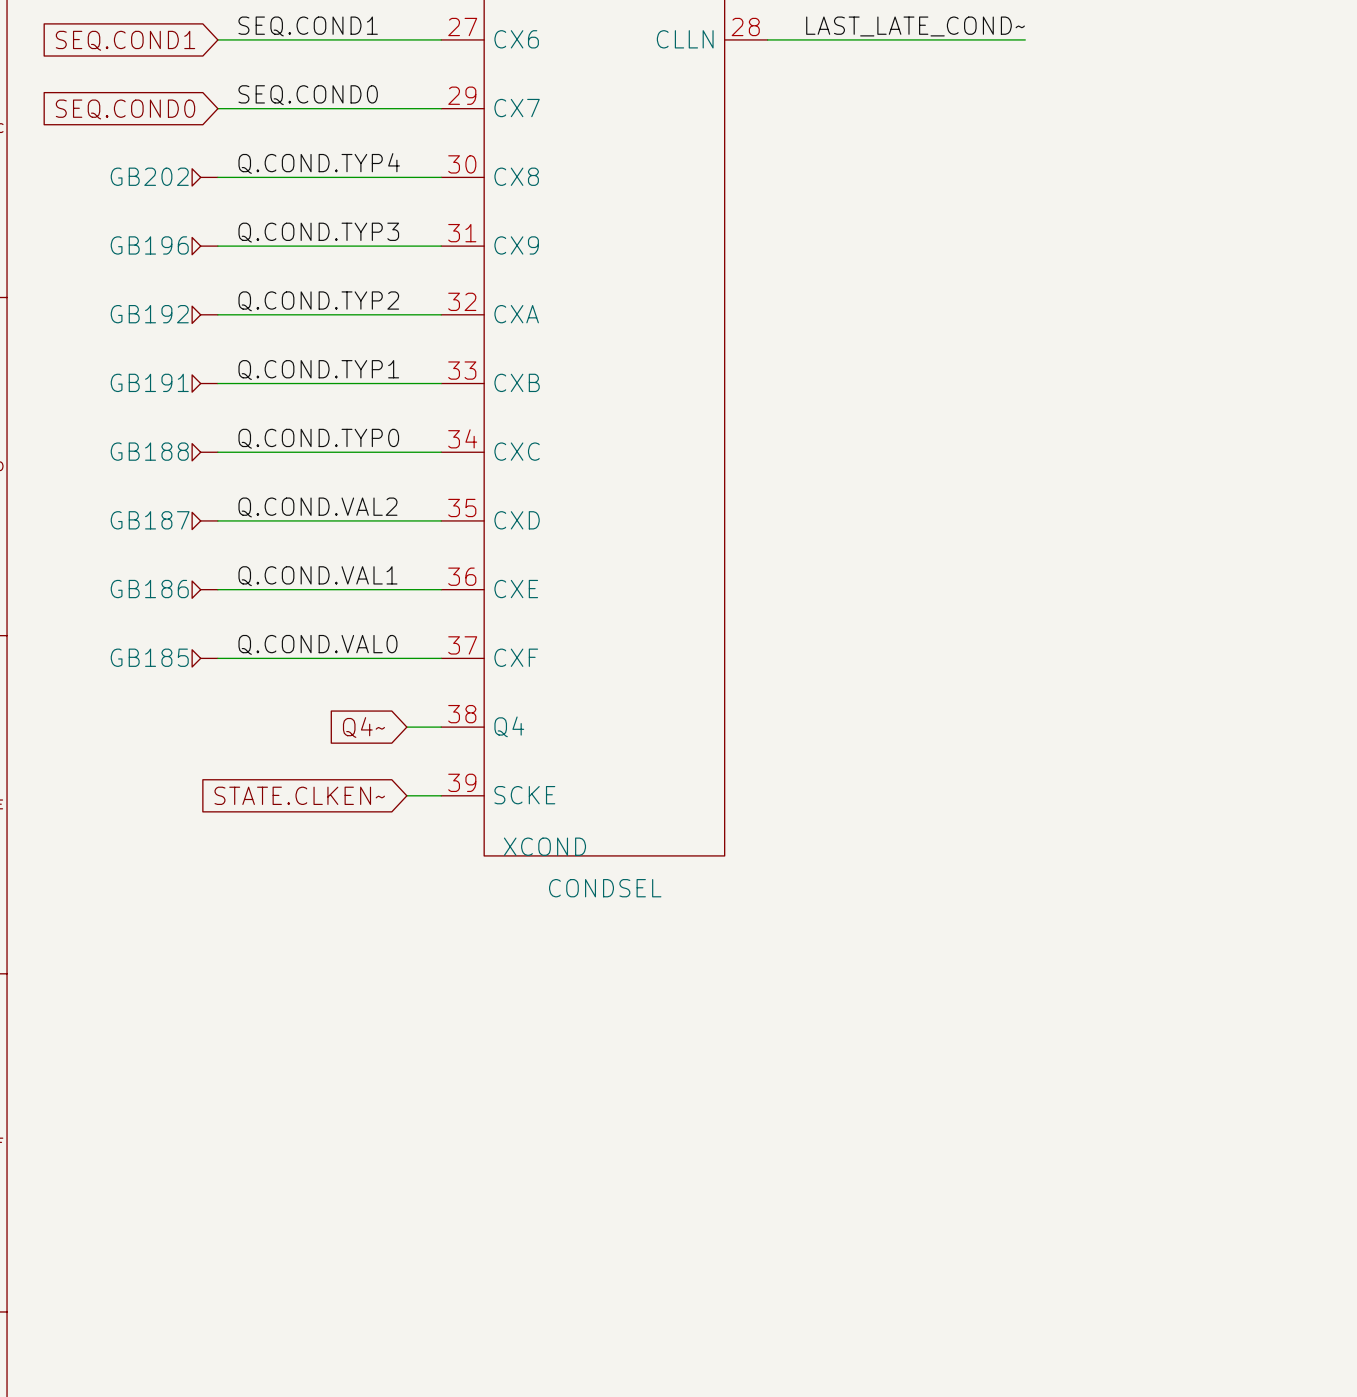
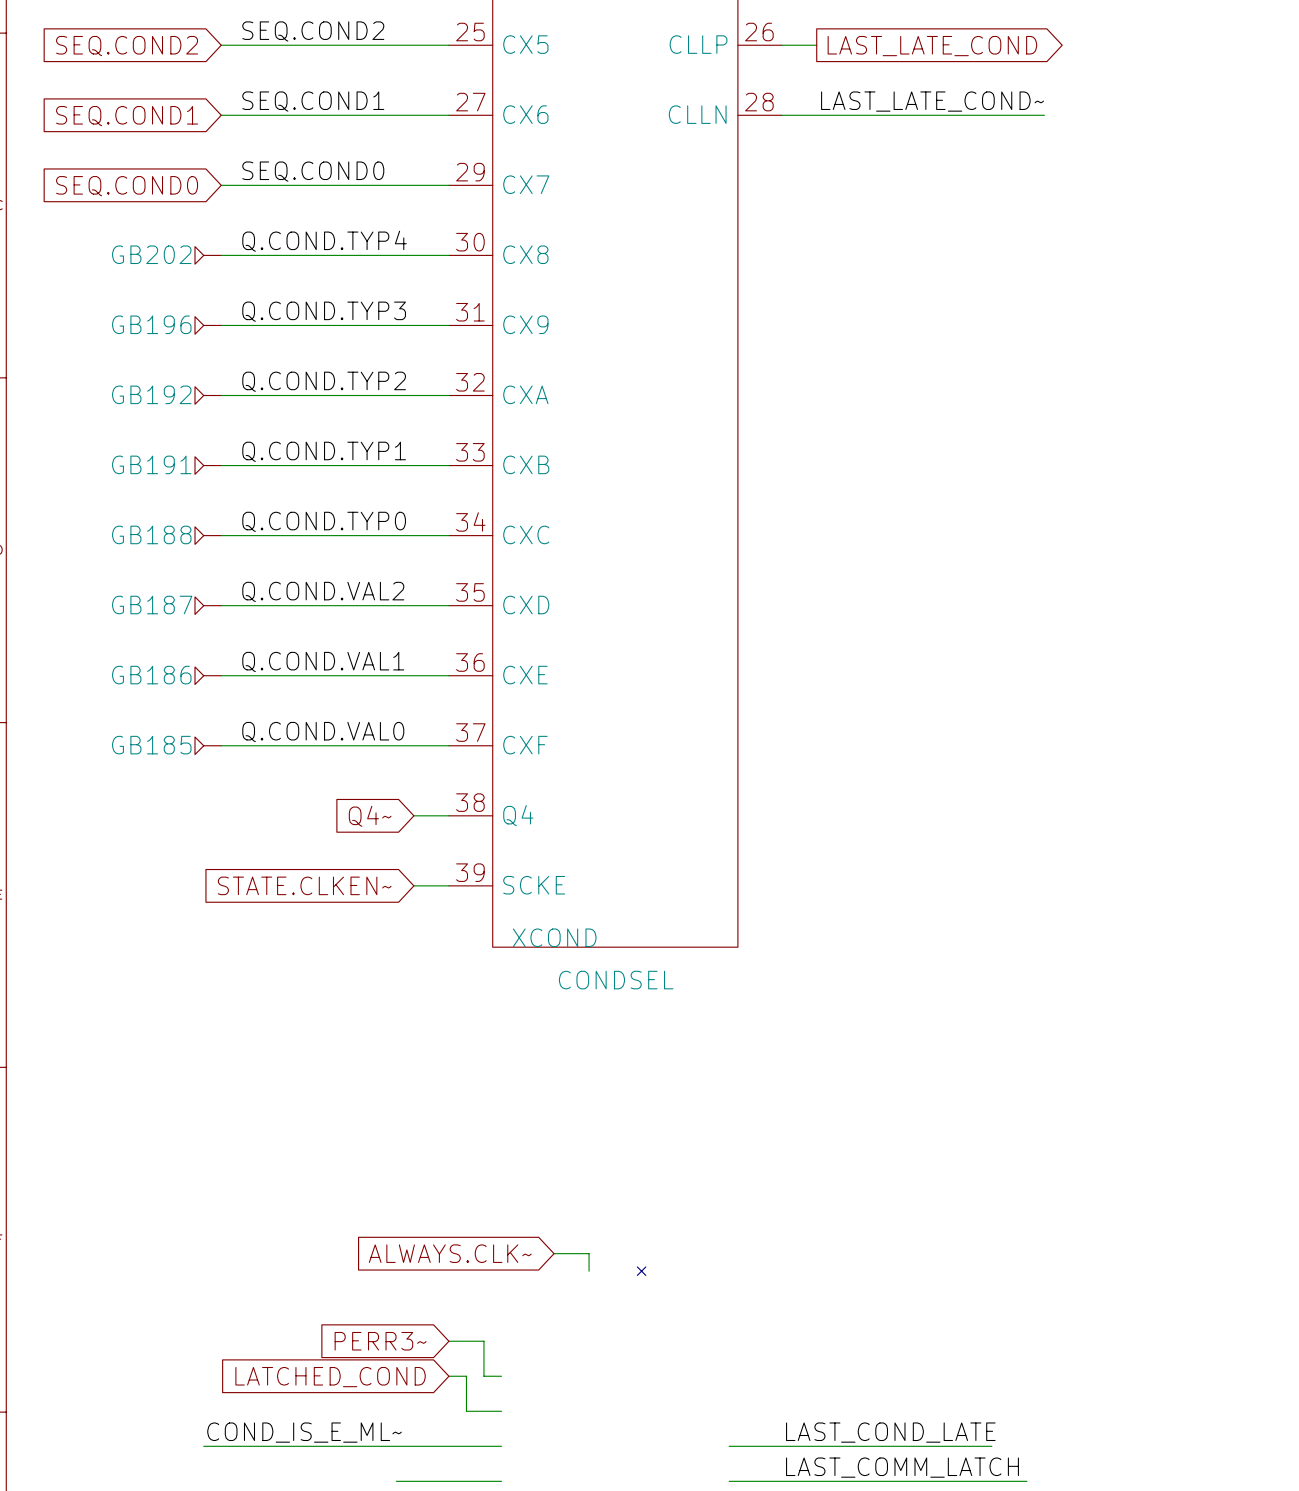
global label: none -> ALWAYS.CLK~ (450, 1253)
wire: none -> (554, 1253) (589, 1253) (589, 1271)
no-connect mark: none -> (641, 1271)
global label: none -> PERR3~ (380, 1341)
wire: none -> (448, 1341) (483, 1341) (483, 1376) (501, 1376)
wire: none -> (448, 1376) (466, 1376) (466, 1411) (501, 1411)
global label: none -> LATCHED_COND (330, 1377)
label: none -> COND_IS_E_ML~ (304, 1432)
label: none -> LAST_COND_LATE (890, 1432)
wire: none -> (203, 1446) (501, 1446)
wire: none -> (729, 1446) (991, 1446)
label: none -> LAST_COMM_LATCH (902, 1467)
wire: none -> (396, 1481) (501, 1481)
wire: none -> (729, 1481) (1026, 1481)

